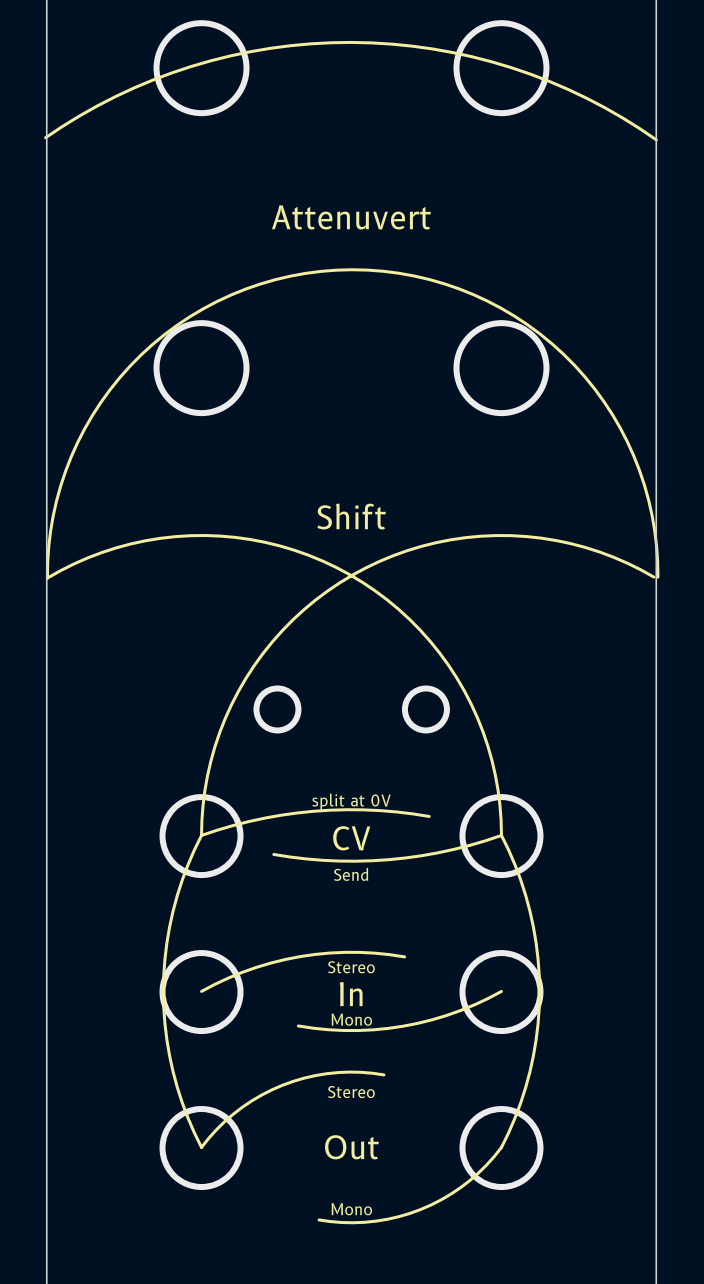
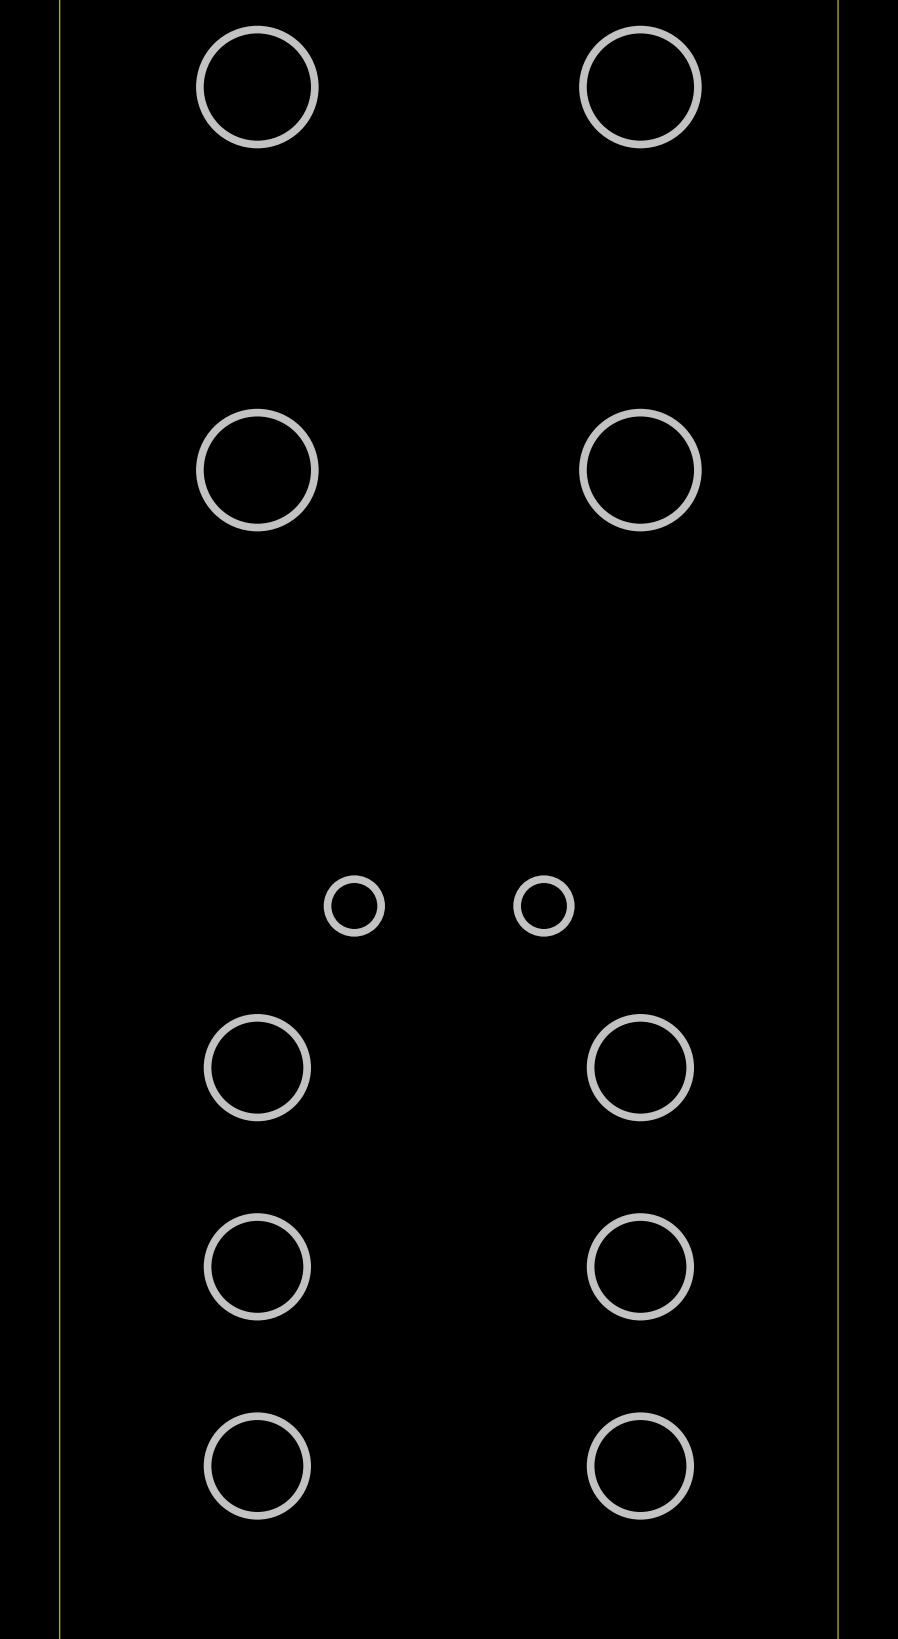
line: (45, 137) (79, 115) (115, 96) (152, 80) (191, 66) (230, 55) (270, 48) (310, 43) (351, 42) (391, 44) (432, 48) (472, 56) (511, 67) (549, 81) (586, 98) (622, 117) (656, 139) -> none
text: Attenuvert (351, 217) -> none
text: Shift (351, 516) -> none
line: (653, 577) (613, 557) (570, 543) (526, 536) (496, 535) (451, 539) (421, 546) (393, 555) (352, 575) (315, 600) (292, 620) (262, 653) (238, 691) (225, 718) (210, 761) (203, 805) (201, 835) -> none
line: (657, 577) (654, 530) (644, 485) (627, 441) (603, 401) (574, 365) (552, 343) (527, 324) (487, 301) (444, 283) (398, 273) (352, 269) (321, 271) (290, 276) (245, 289) (203, 308) (177, 325) (152, 344) (119, 377) (92, 415) (77, 442) (60, 486) (50, 531) (47, 578) (87, 557) (116, 547) (160, 538) (205, 535) (250, 539) (279, 545) (322, 560) (349, 574) (374, 590) (409, 619) (430, 641) (456, 677) (477, 718) (492, 760) (499, 805) (501, 835) -> none
text: split at 0V (351, 801) -> none
line: (429, 816) (380, 810) (314, 811) (249, 821) (201, 835) -> none
line: (201, 835) (182, 880) (173, 911) (166, 942) (163, 991) (166, 1039) (173, 1071) (187, 1117) (201, 1147) (233, 1114) (251, 1100) (282, 1085) (326, 1073) (349, 1072) (383, 1074) -> none
line: (501, 835) (515, 864) (529, 911) (536, 942) (539, 975) (538, 1023) (533, 1055) (520, 1102) (508, 1132) (501, 1147) (478, 1173) (451, 1193) (431, 1204) (409, 1213) (376, 1221) (353, 1222) (319, 1219) -> none
line: (501, 835) (454, 849) (388, 859) (339, 861) (273, 854) -> none
text: CV (351, 838) -> none
text: Send (351, 874) -> none
line: (404, 956) (344, 952) (300, 956) (242, 972) (201, 991) -> none
text: Stereo (351, 967) -> none
line: (501, 991) (446, 1015) (402, 1026) (343, 1030) (298, 1025) -> none
text: In (351, 994) -> none
text: Mono (351, 1019) -> none
text: Stereo (351, 1092) -> none
text: Out (351, 1147) -> none
text: Mono (351, 1209) -> none

